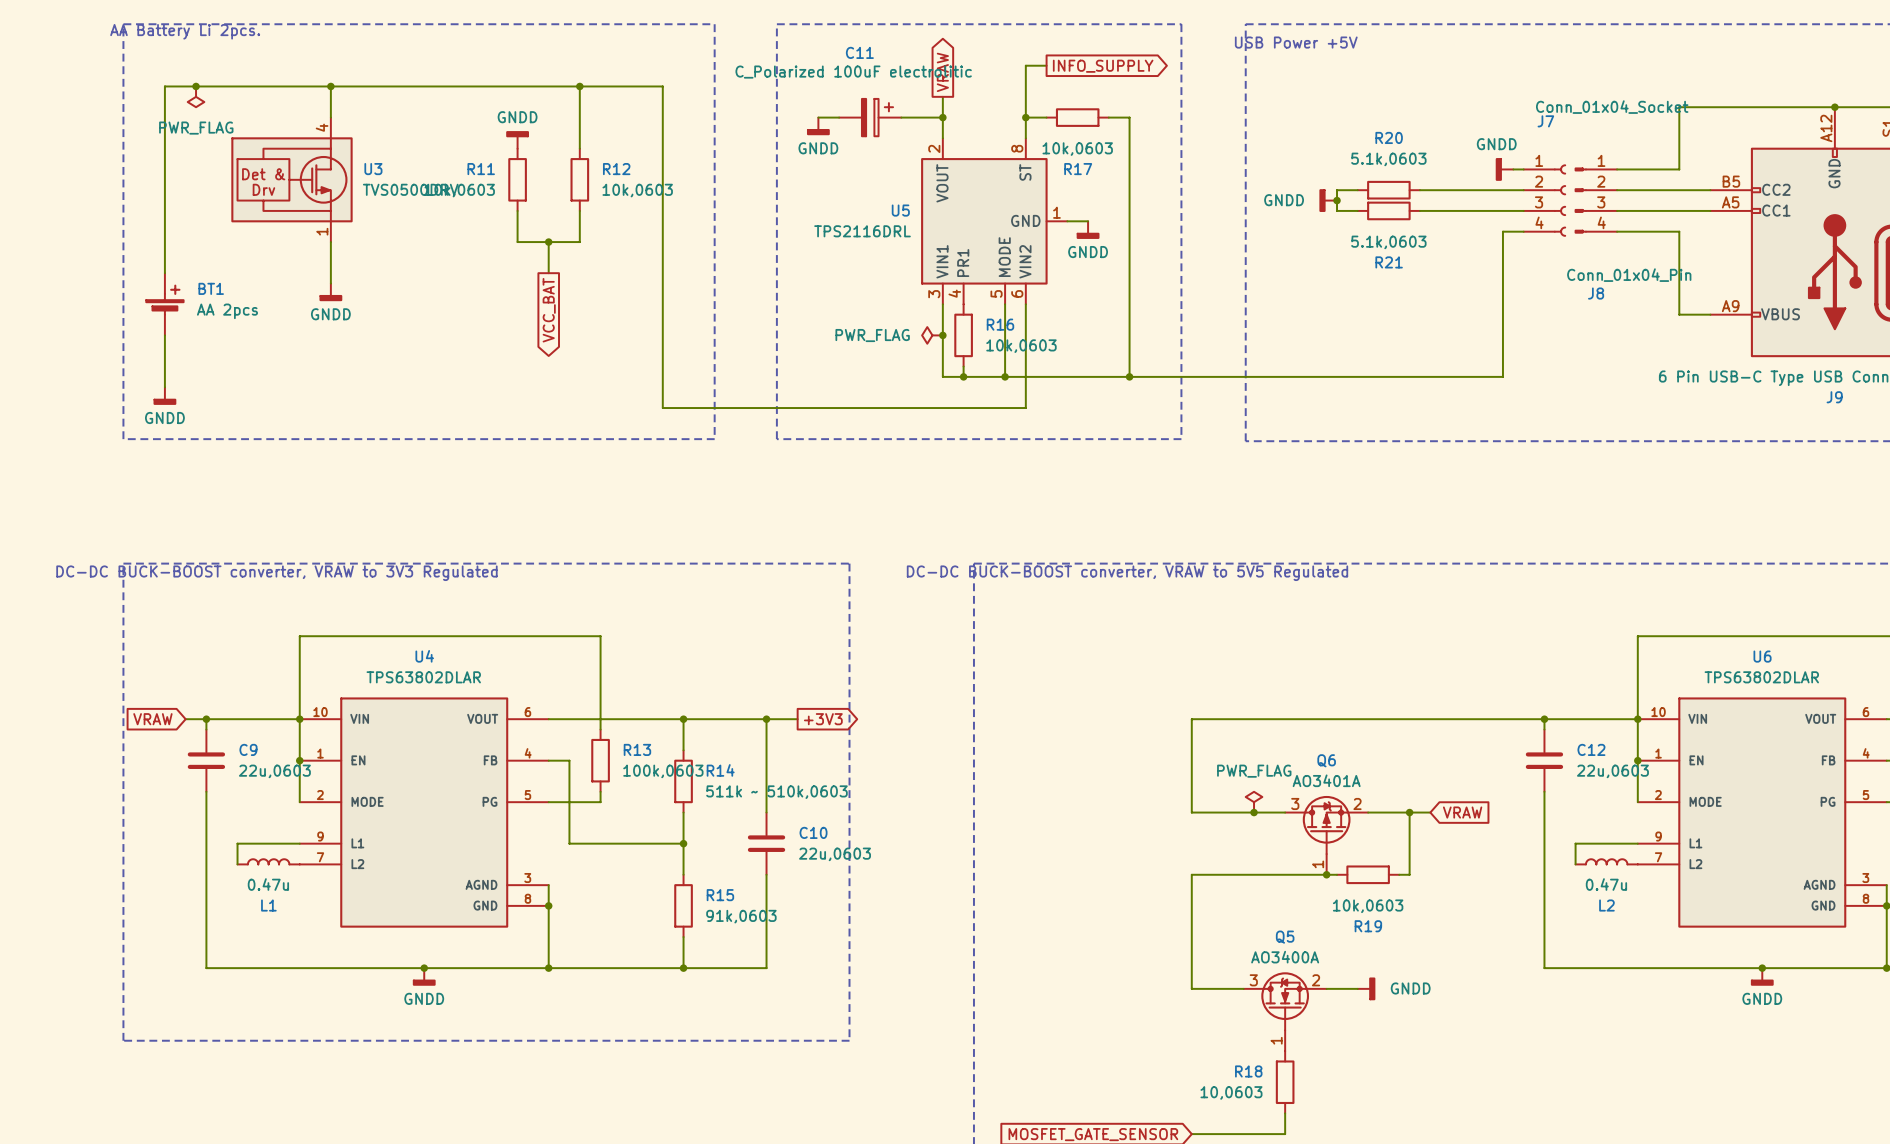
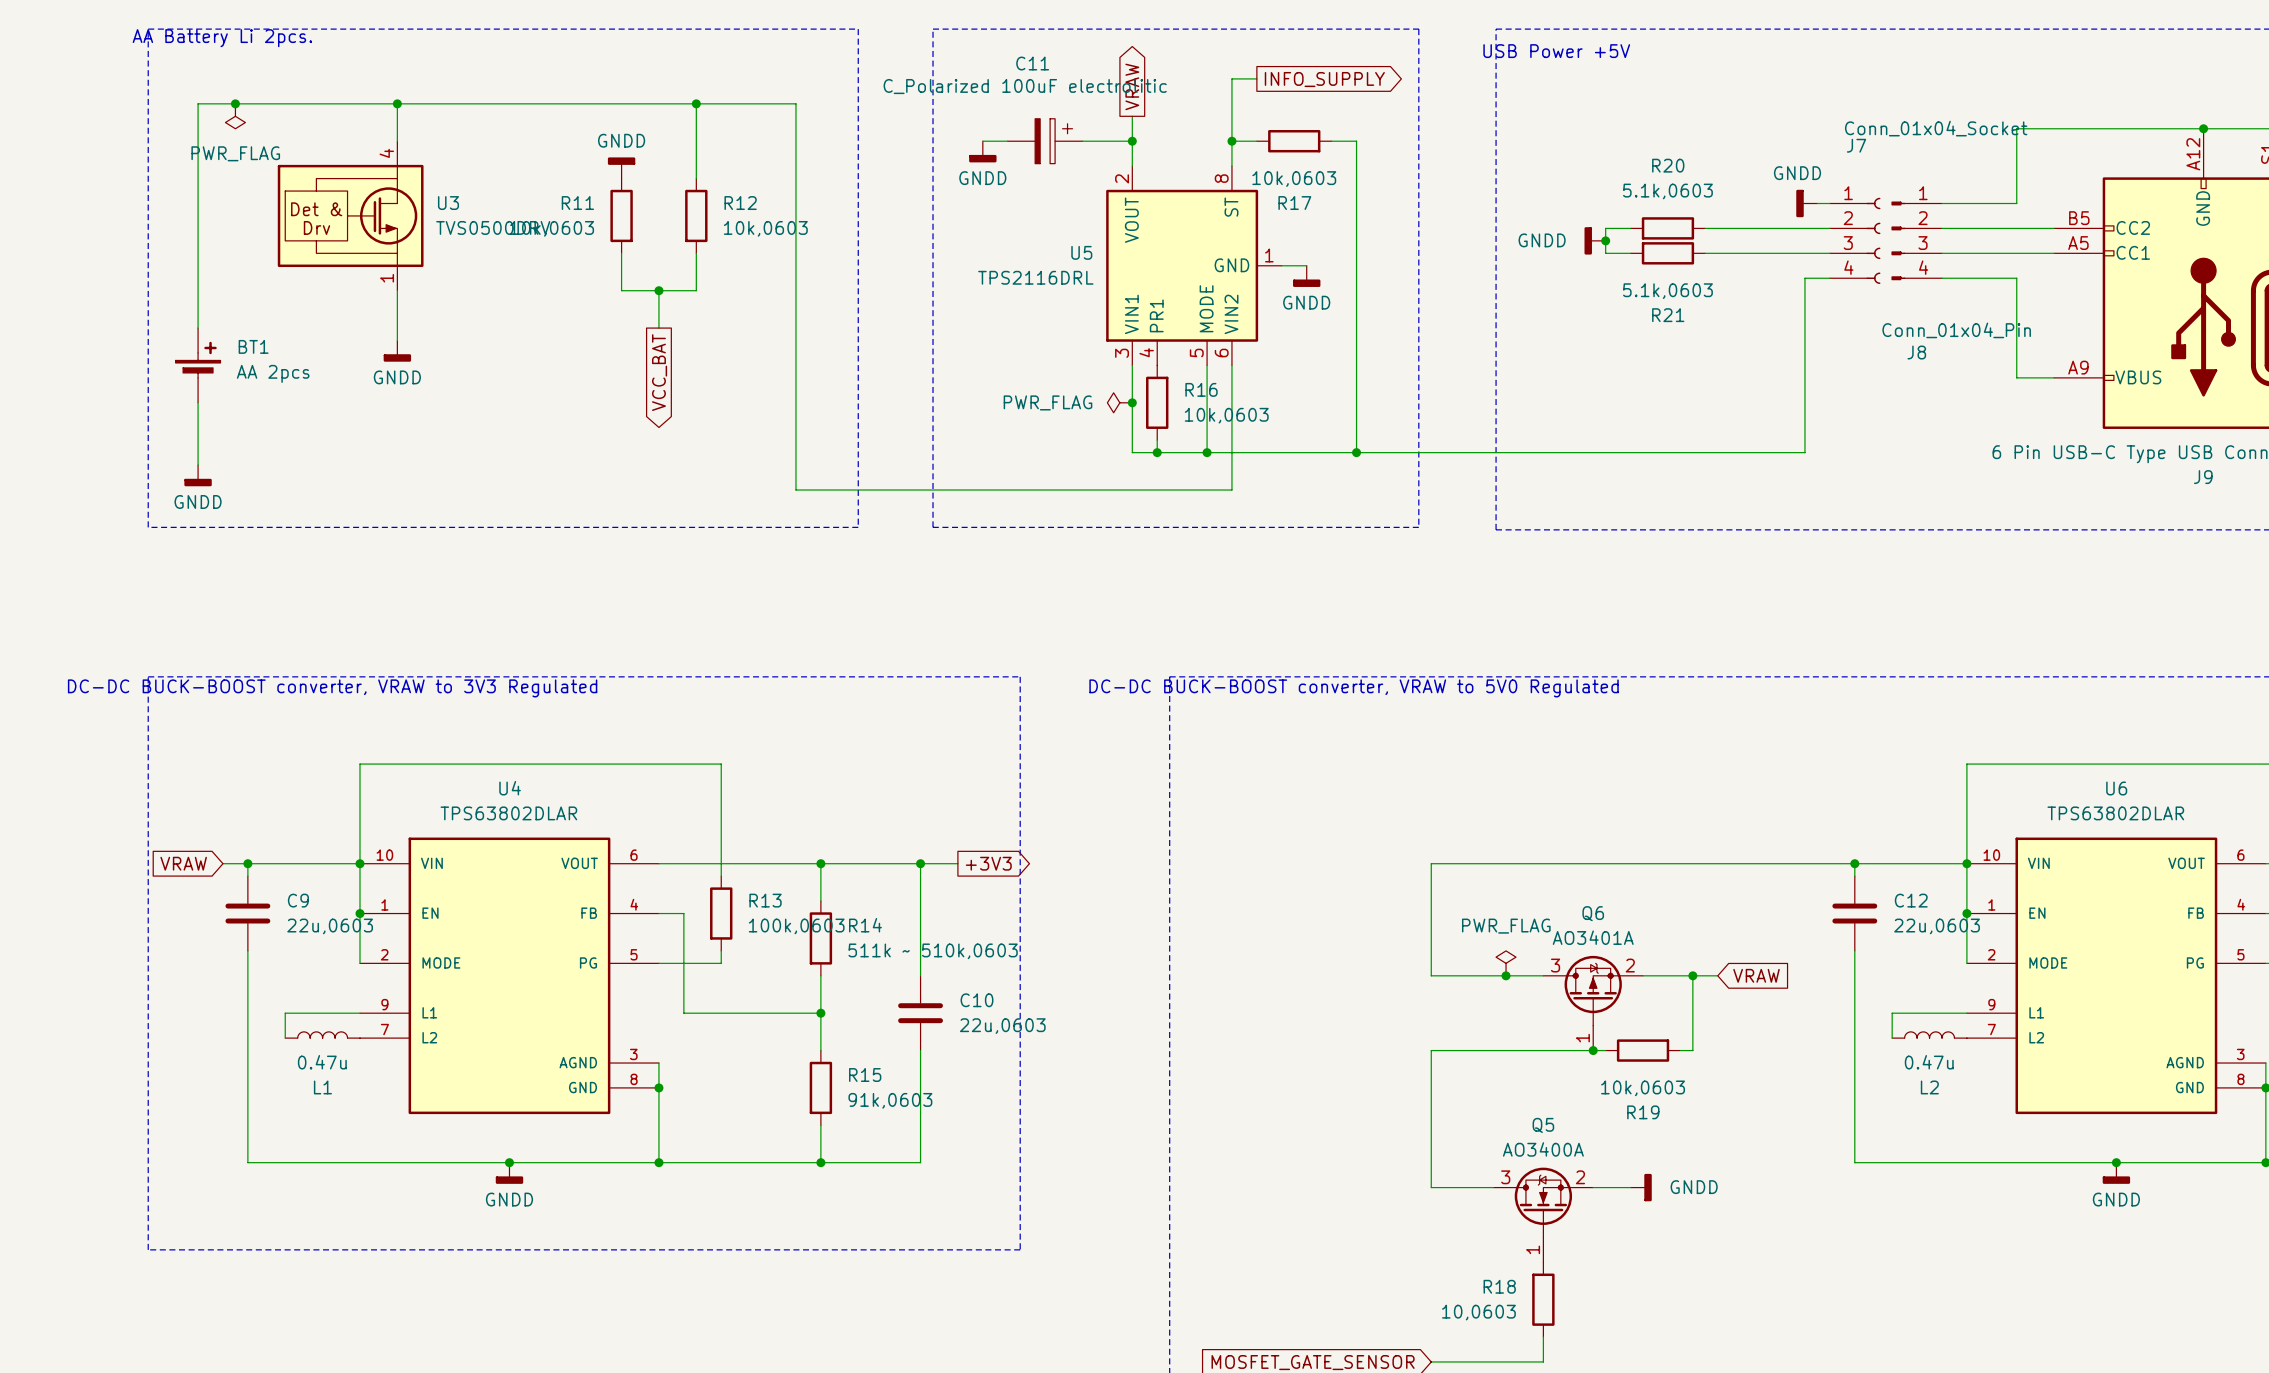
text: DC-DC BUCK-BOOST converter, VRAW to 5V5 Regulated (1127, 573) -> DC-DC BUCK-BOOST converter, VRAW to 5V0 Regulated (1354, 688)

